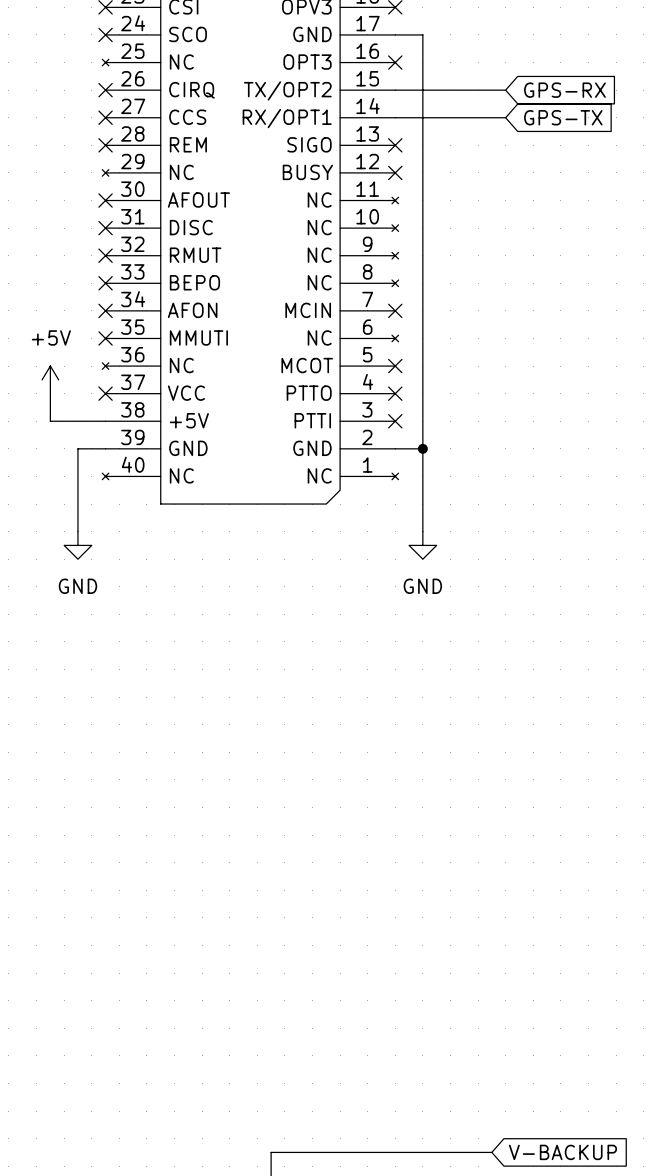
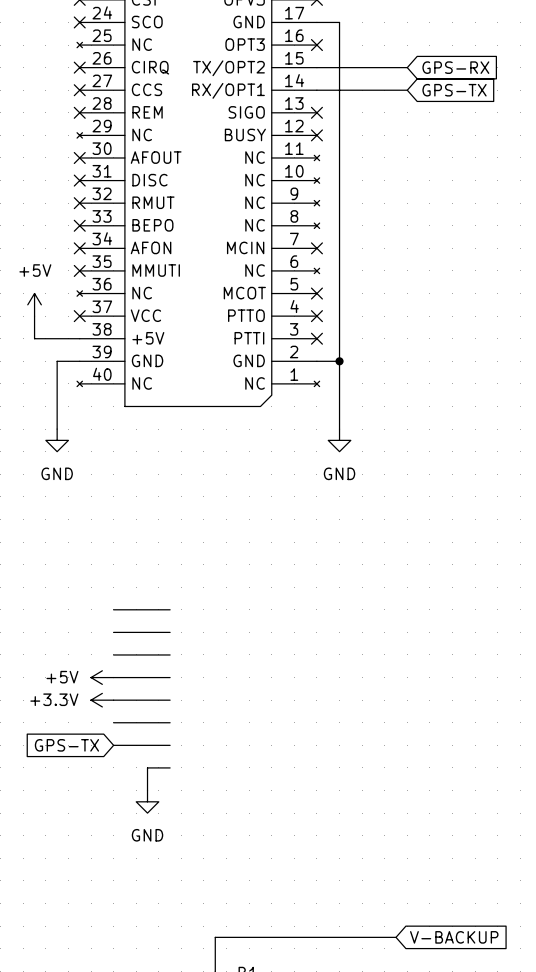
wire: none -> (113, 609) (170, 609)
wire: none -> (113, 632) (170, 632)
wire: none -> (113, 654) (170, 654)
power symbol: none -> +5V (102, 677)
wire: none -> (113, 677) (170, 677)
power symbol: none -> +3.3V (102, 700)
wire: none -> (113, 700) (170, 700)
wire: none -> (113, 722) (170, 722)
global label: none -> GPS-TX (66, 745)
wire: none -> (113, 745) (170, 745)
wire: none -> (170, 767) (147, 767) (147, 790)
power symbol: none -> GND (147, 801)

